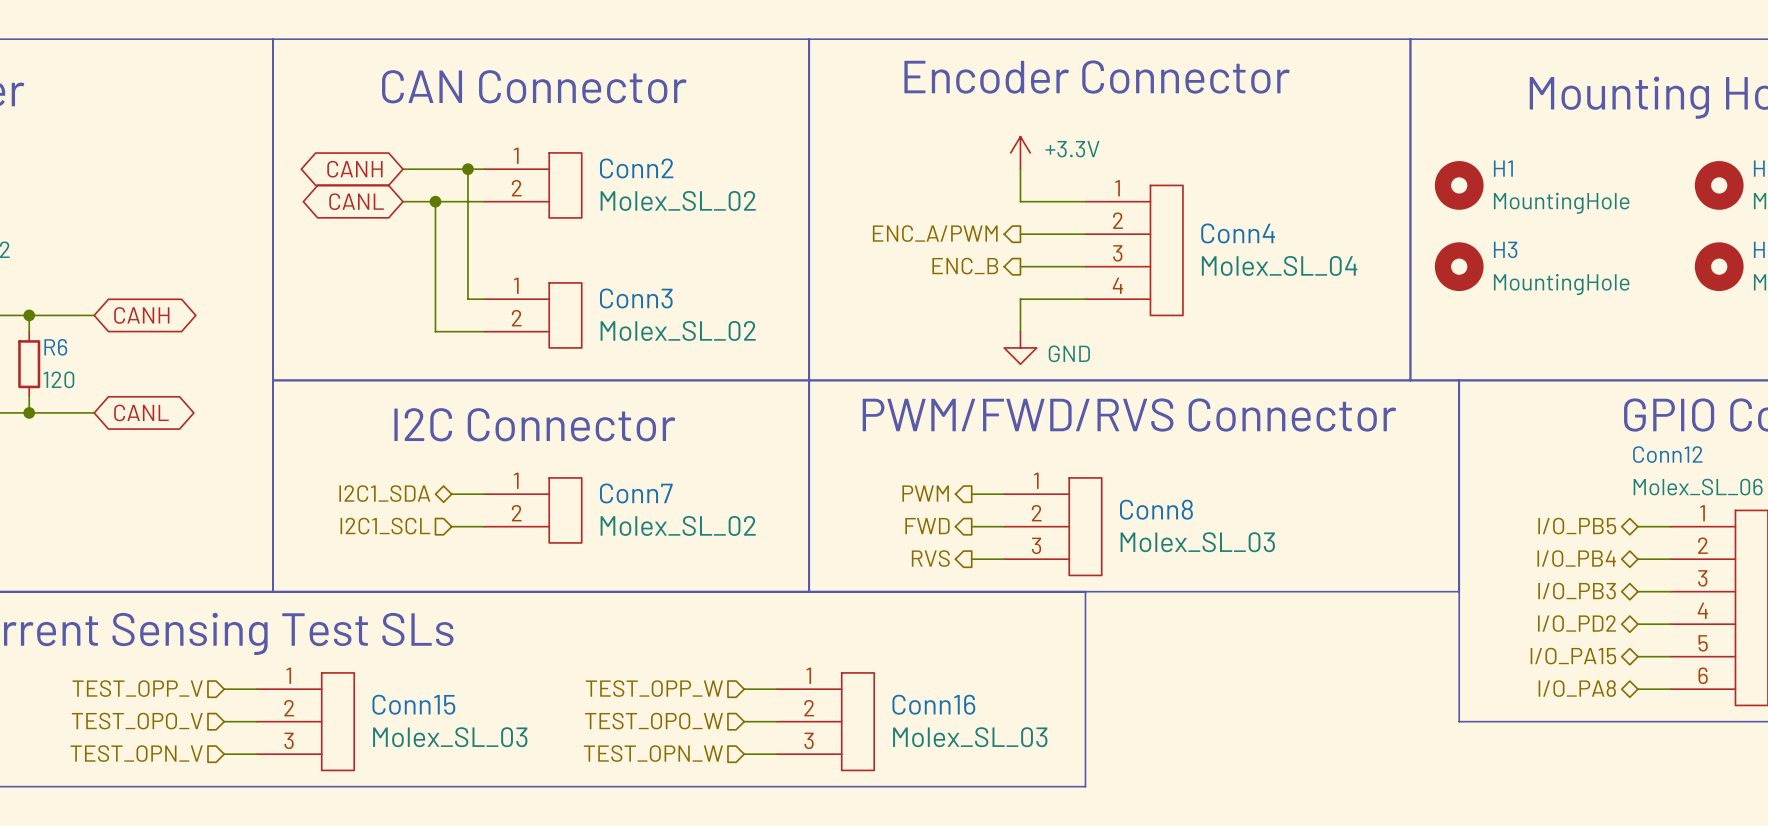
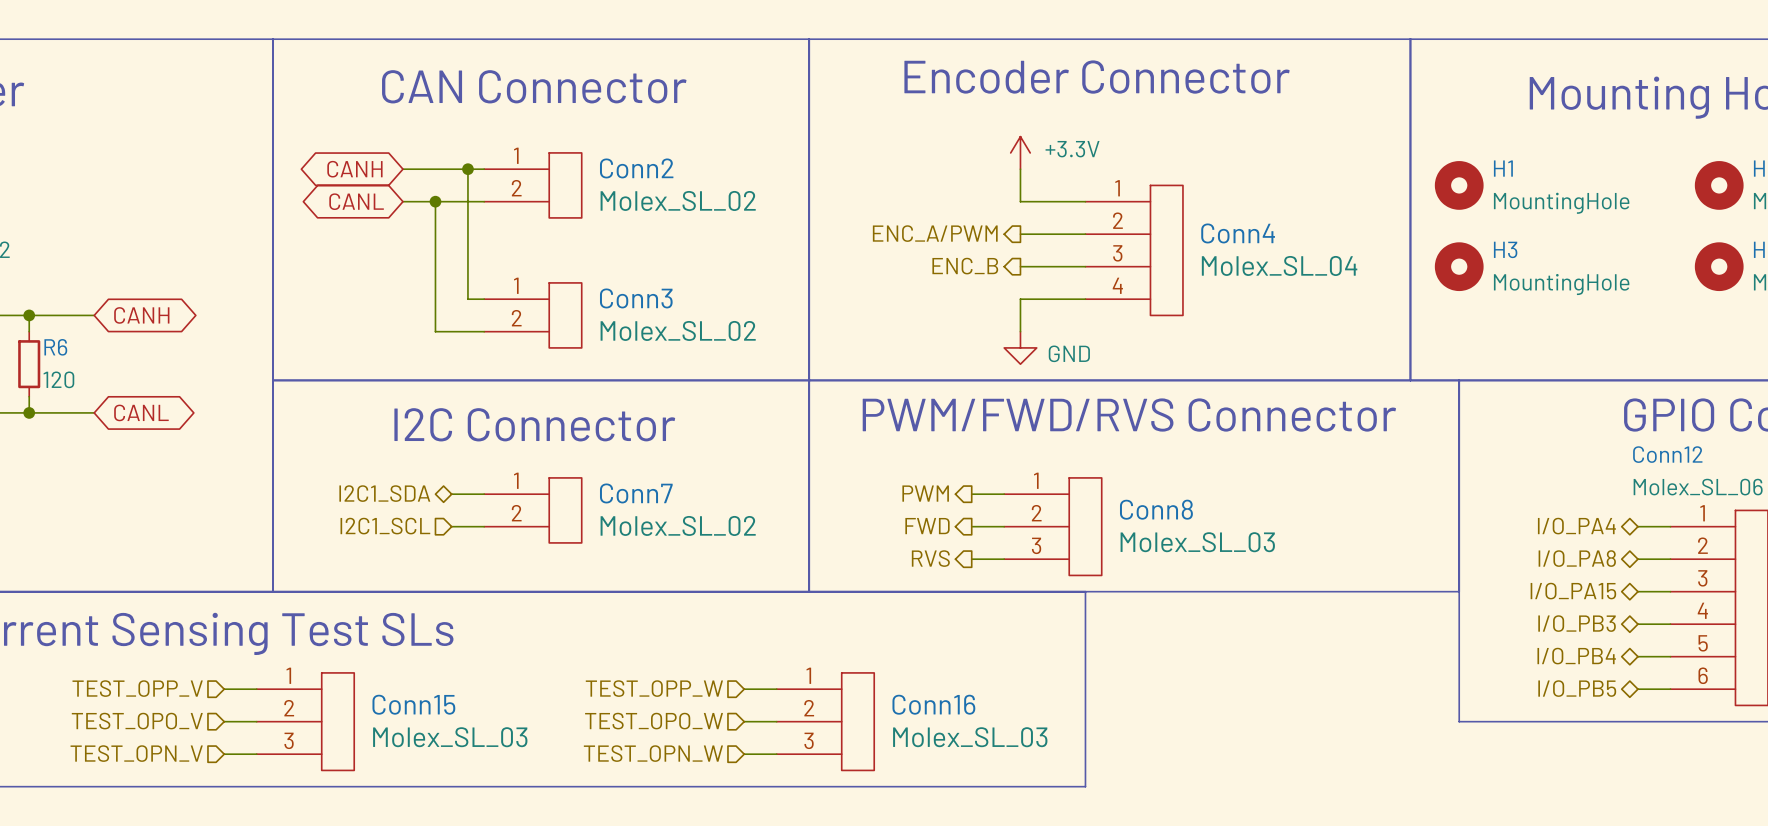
hierarchical label: I/O_PB5 (1577, 526) -> I/O_PA4 (1576, 526)
hierarchical label: I/O_PB4 (1576, 558) -> I/O_PA8 (1577, 558)
hierarchical label: I/O_PB3 (1577, 591) -> I/O_PA15 (1573, 591)
hierarchical label: I/O_PD2 (1576, 623) -> I/O_PB3 (1577, 623)
hierarchical label: I/O_PA15 (1573, 656) -> I/O_PB4 (1576, 656)
hierarchical label: I/O_PA8 (1577, 688) -> I/O_PB5 (1577, 688)

